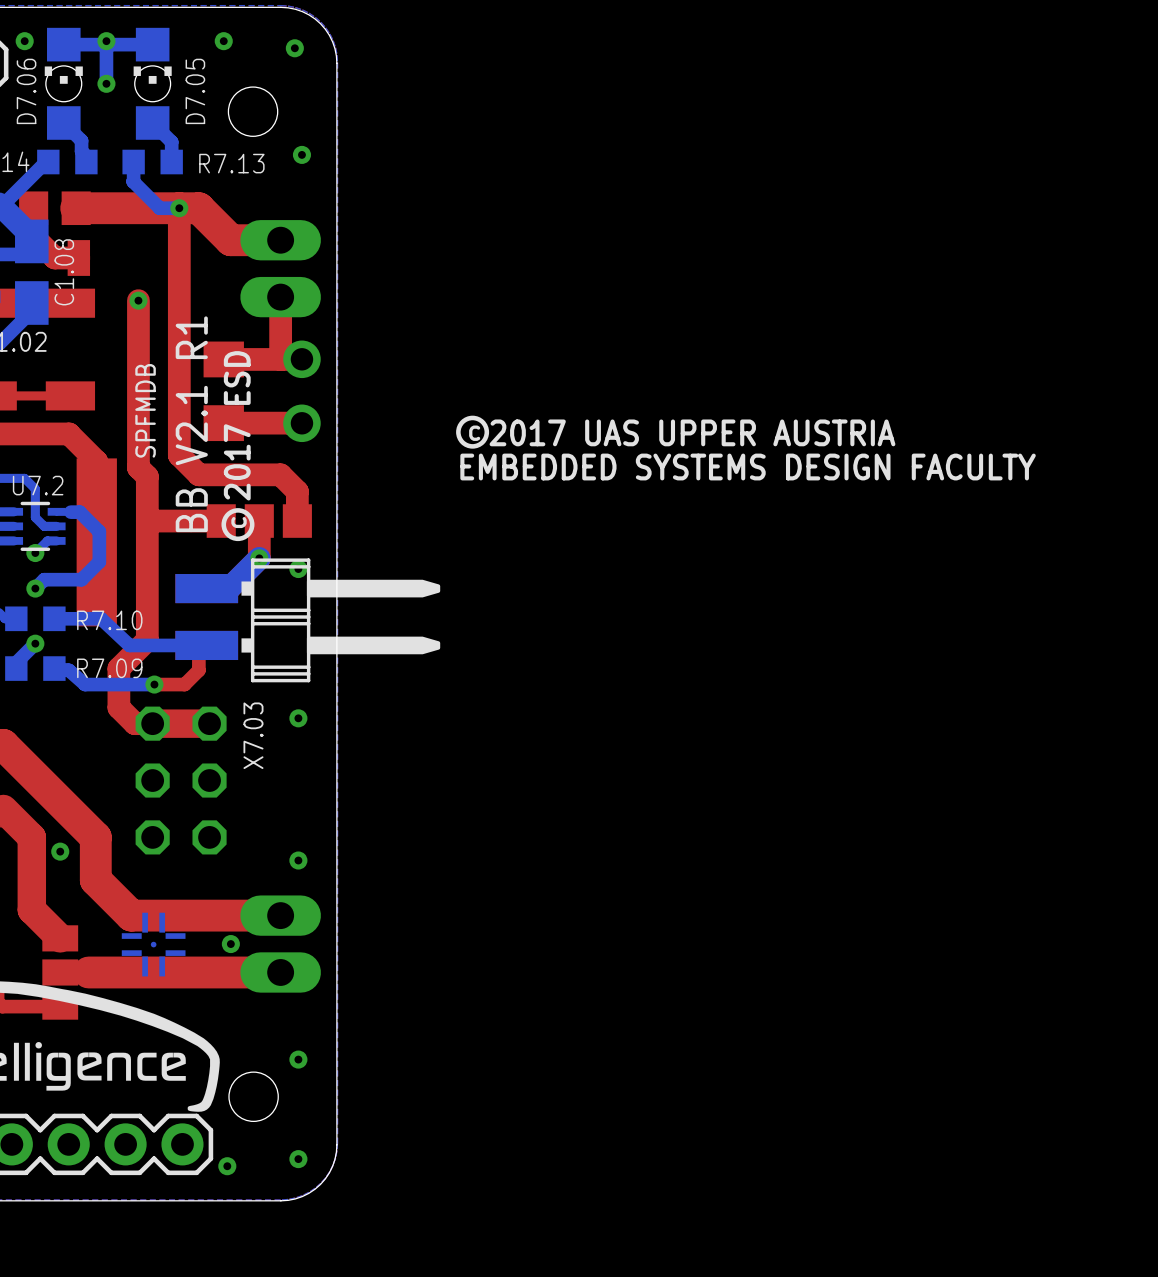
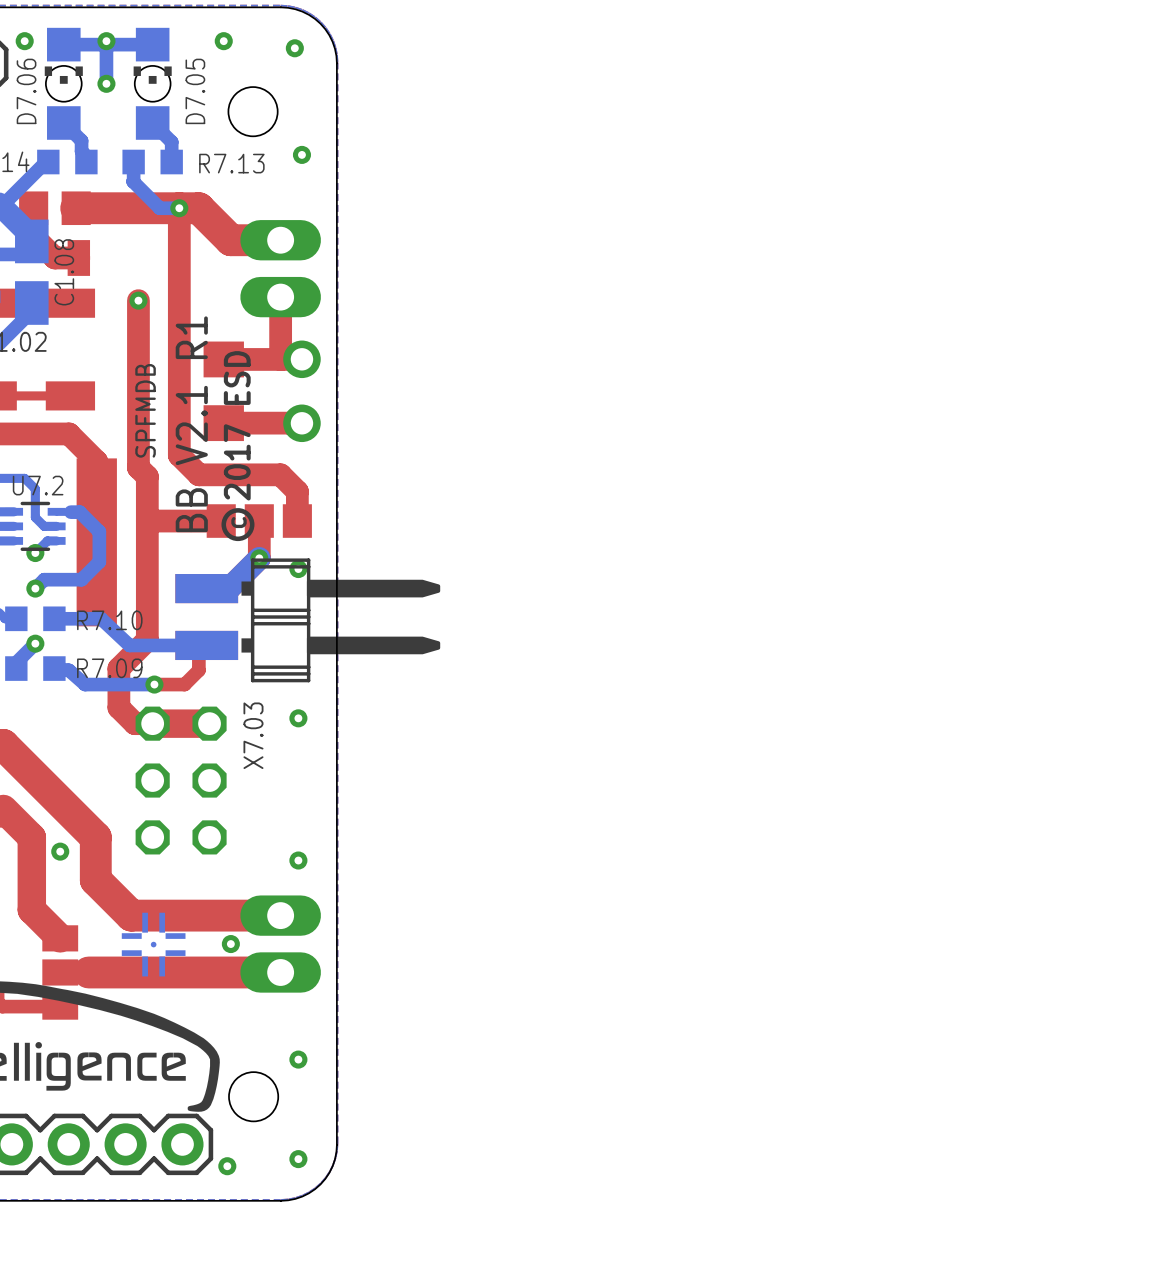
drawing: [456, 415, 490, 449] -> none
text: 2017 UAS UPPER AUSTRIA (692, 432) -> none
text: c (474, 433) -> none
text: EMBEDDED SYSTEMS DESIGN FACULTY (748, 467) -> none

